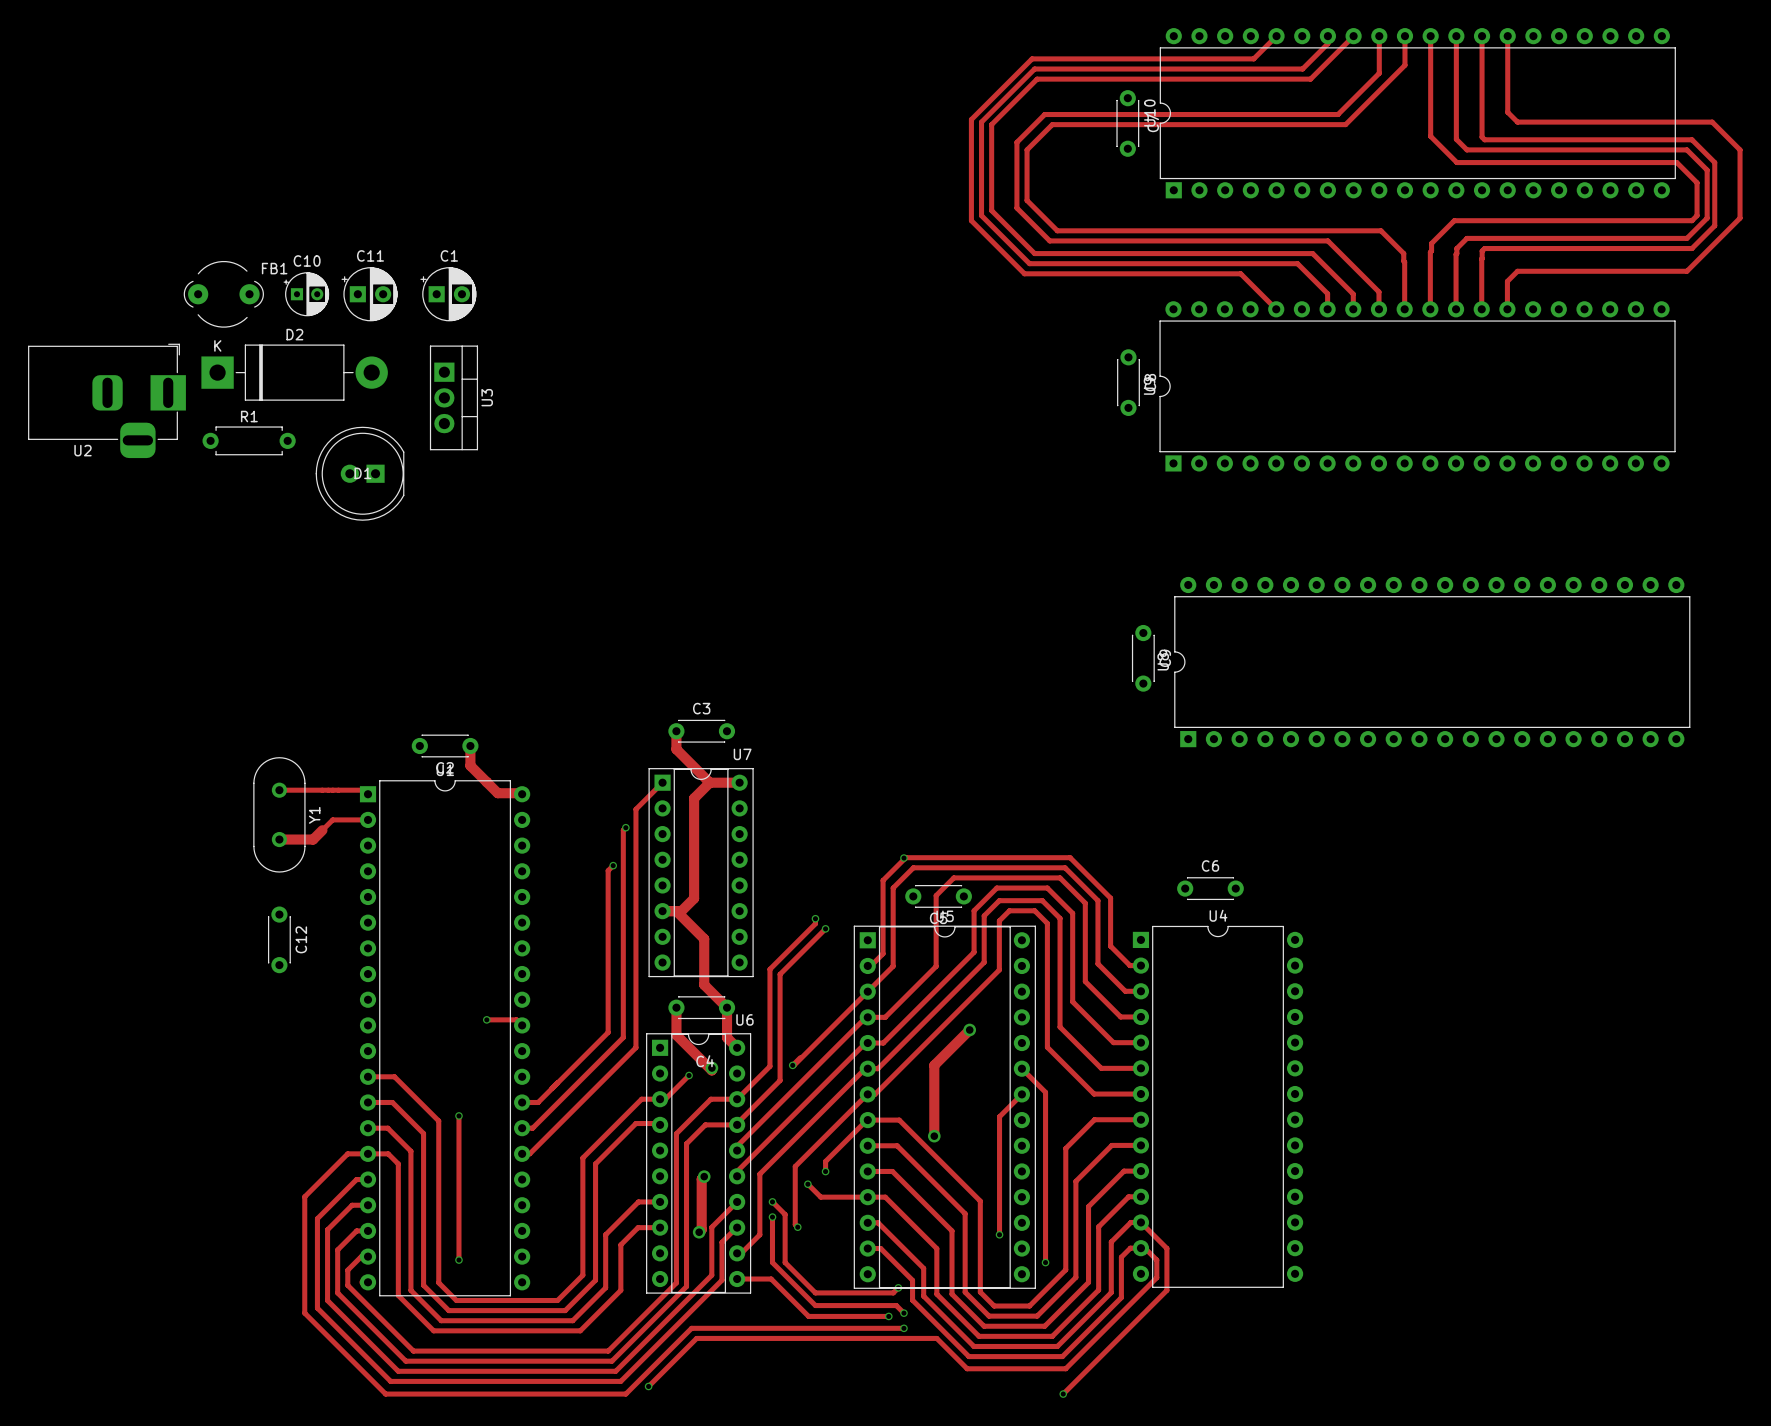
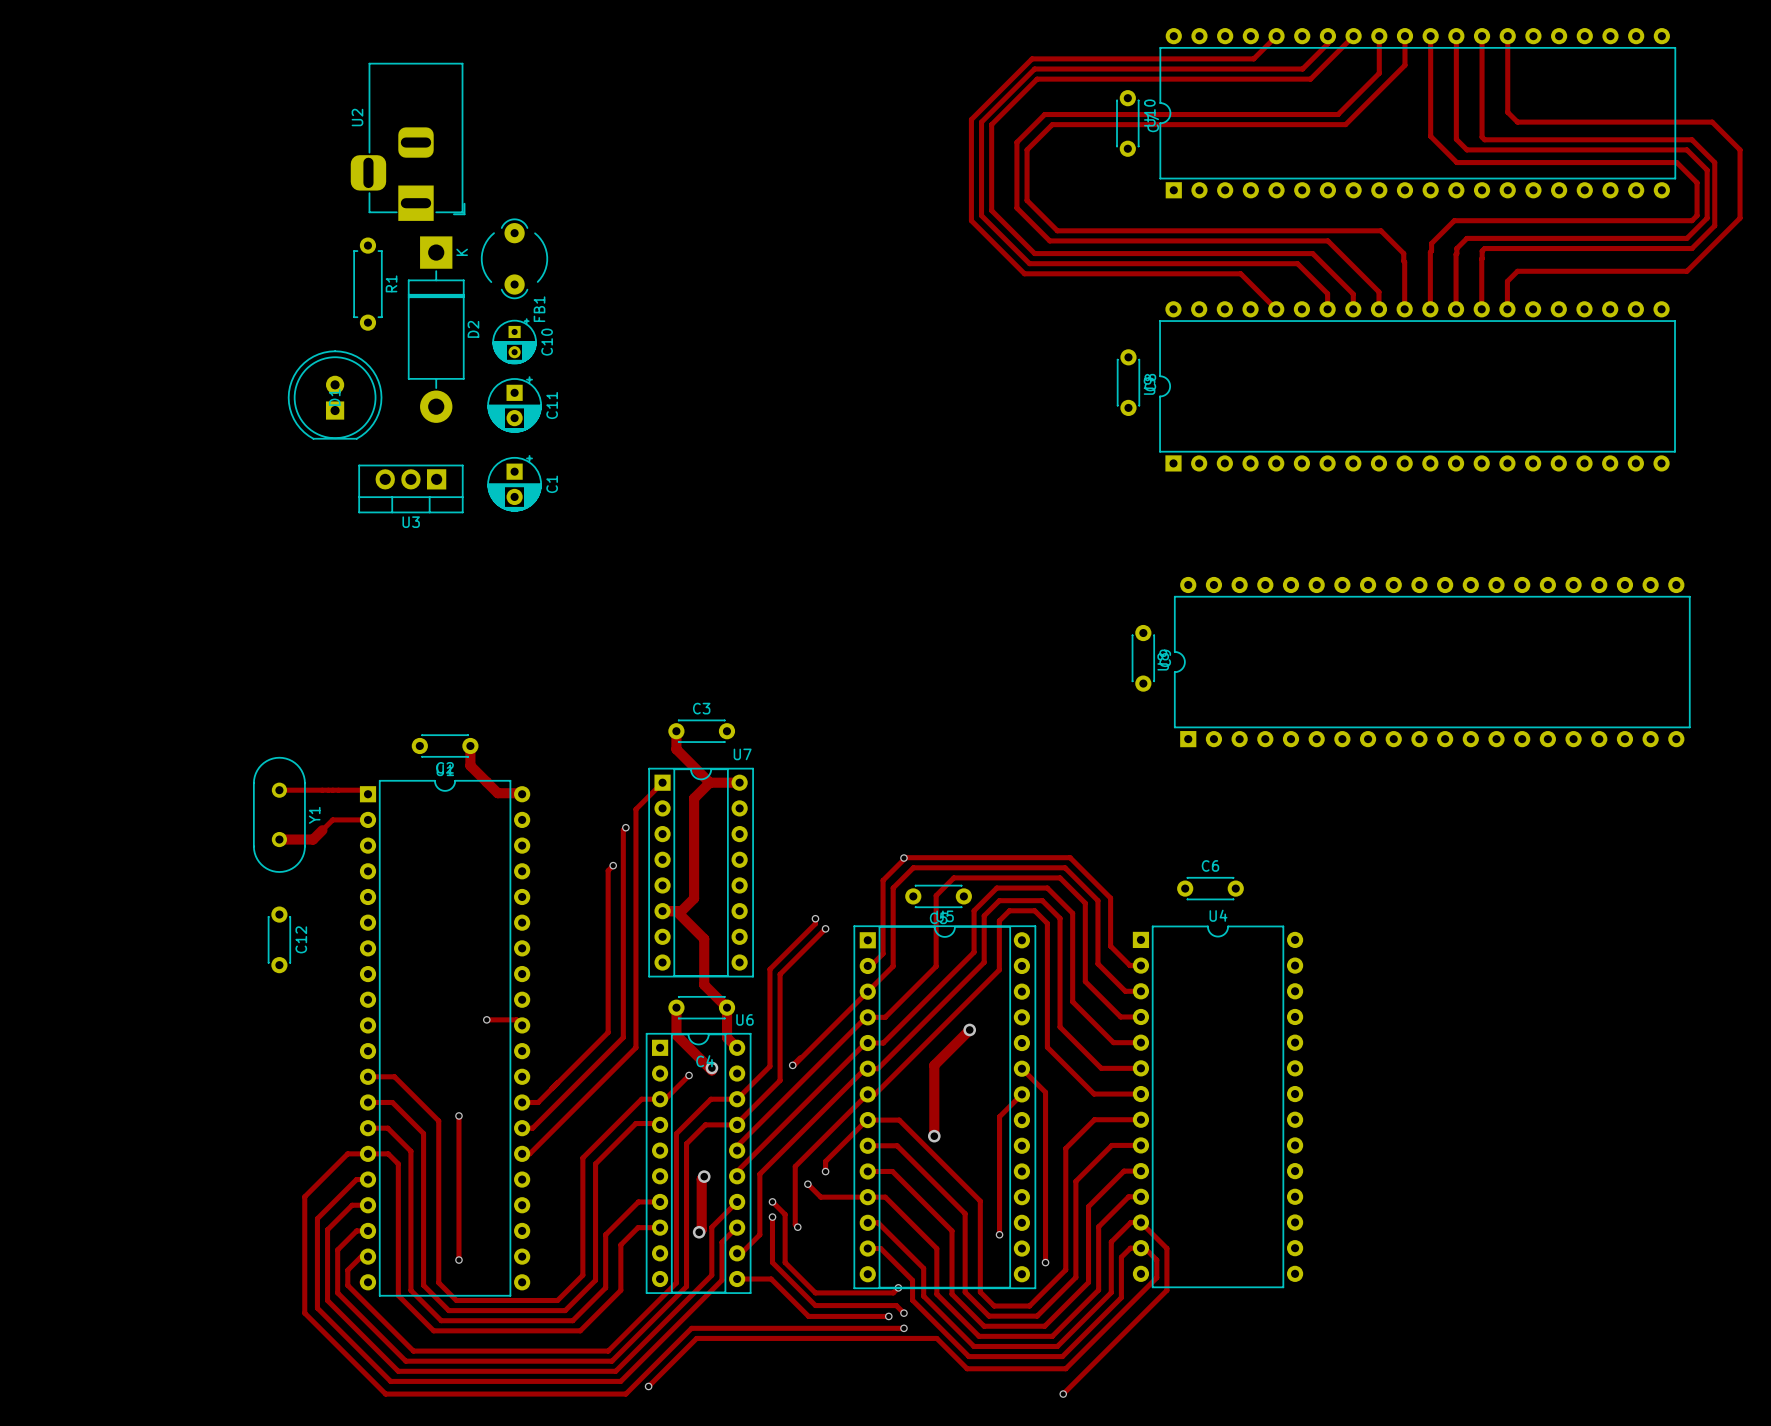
FB1 rotation: 0° (223, 294) -> 90° clockwise (514, 258)
FB1 position: (223, 294) -> (514, 258)
C10 rotation: 0° (306, 294) -> 90° clockwise (514, 341)
C10 position: (306, 294) -> (514, 341)
C11 rotation: 0° (369, 294) -> 90° clockwise (514, 404)
C11 position: (369, 294) -> (514, 404)
C1 rotation: 0° (448, 294) -> 90° clockwise (514, 483)
C1 position: (448, 294) -> (514, 483)
D2 rotation: 0° (294, 372) -> 90° clockwise (436, 329)
D2 position: (294, 372) -> (436, 329)
U3 rotation: 0° (453, 397) -> 90° clockwise (410, 488)
U3 position: (453, 397) -> (410, 488)
U2 rotation: 0° (106, 400) -> 90° clockwise (407, 141)
U2 position: (106, 400) -> (407, 141)
R1 rotation: 0° (249, 440) -> 90° clockwise (367, 284)
R1 position: (249, 440) -> (367, 284)
D1 rotation: 0° (360, 473) -> 90° clockwise (335, 395)
D1 position: (360, 473) -> (335, 395)

